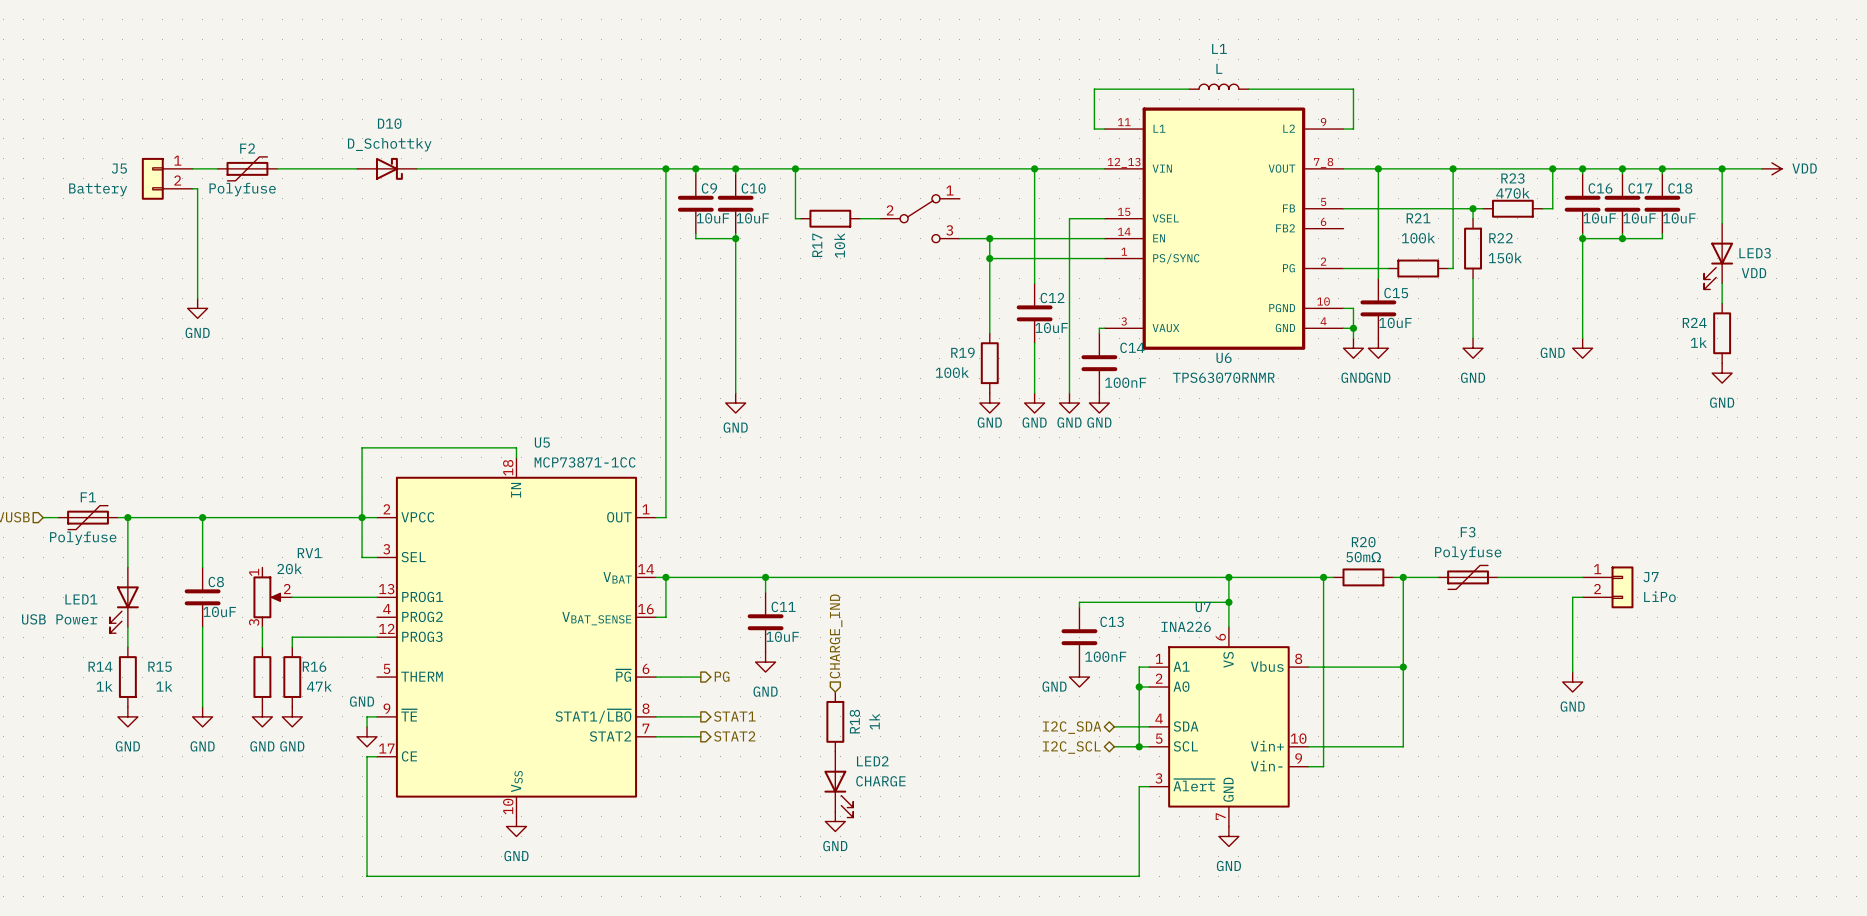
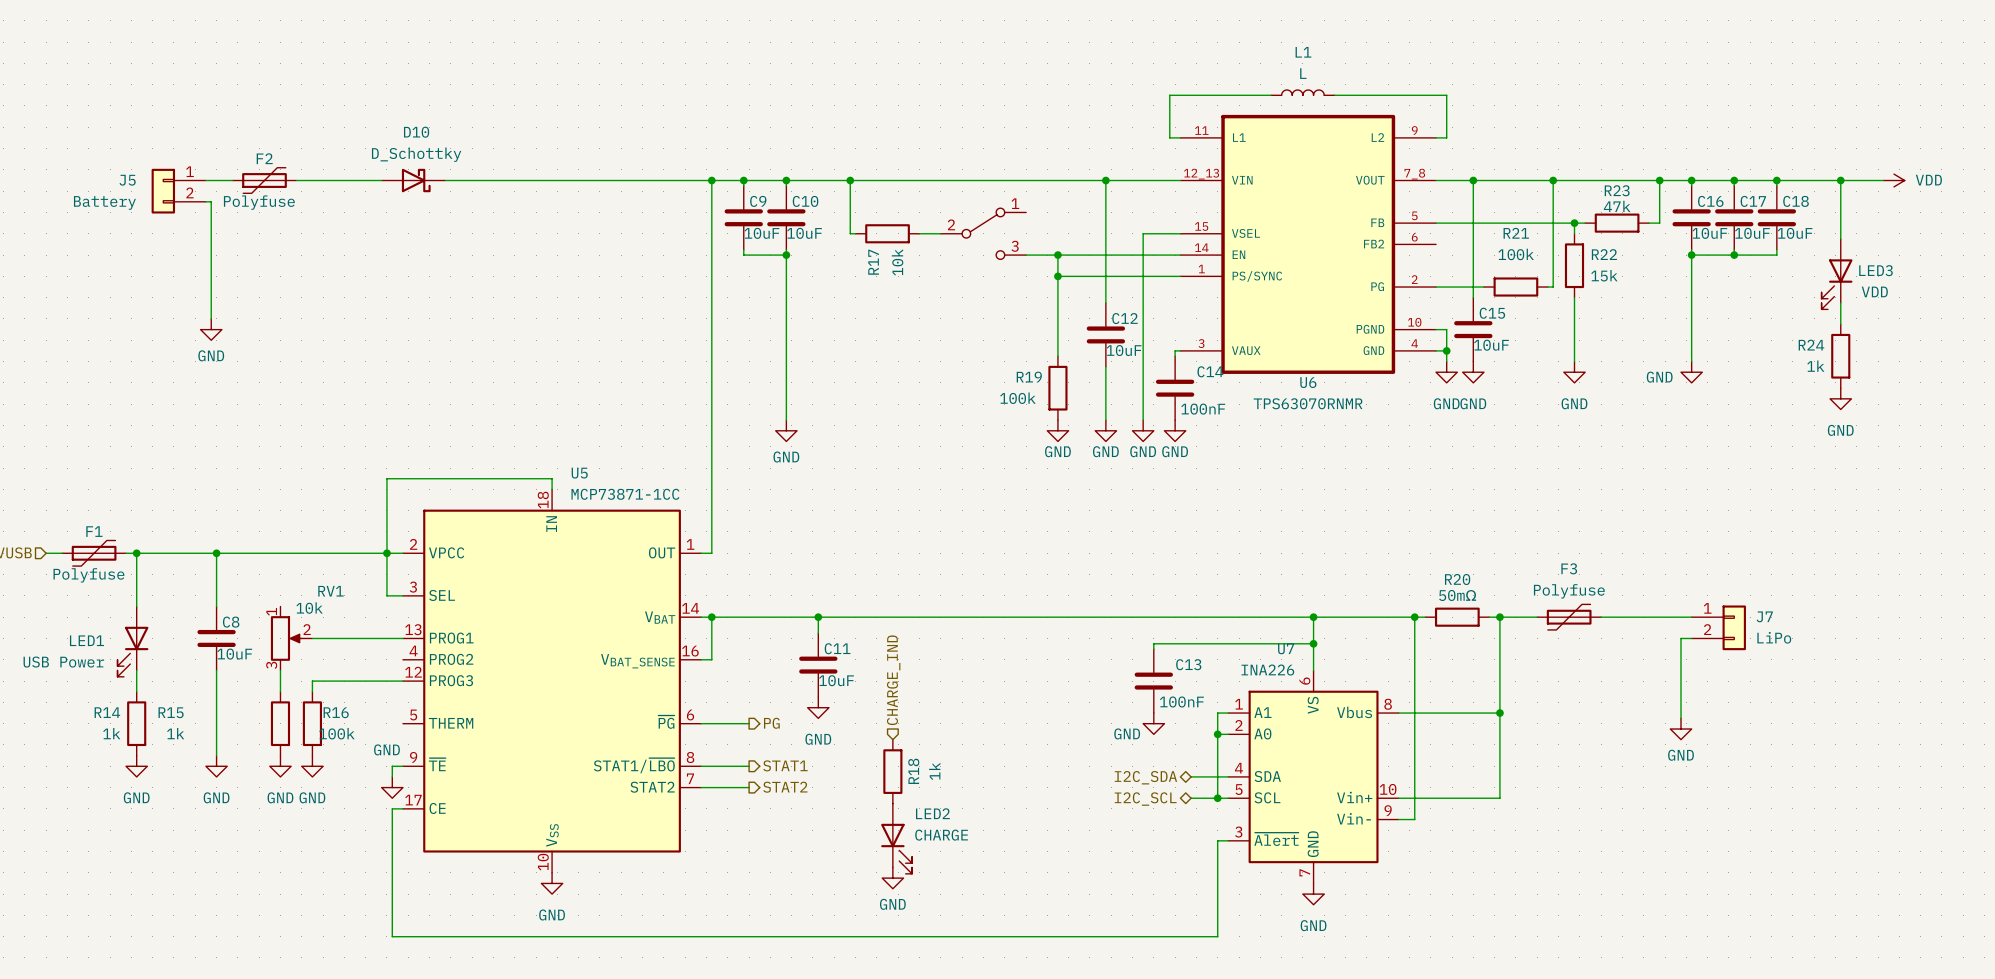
R23 value: 470k (1512, 193) -> 47k (1617, 206)
R22 value: 150k (1505, 257) -> 15k (1604, 275)
RV1 value: 20k (289, 568) -> 10k (309, 608)
R16 value: 47k (319, 686) -> 100k (336, 733)

